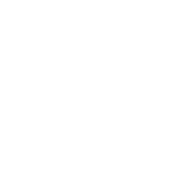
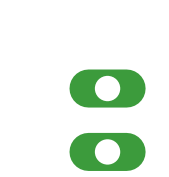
part: none -> (107, 120)

